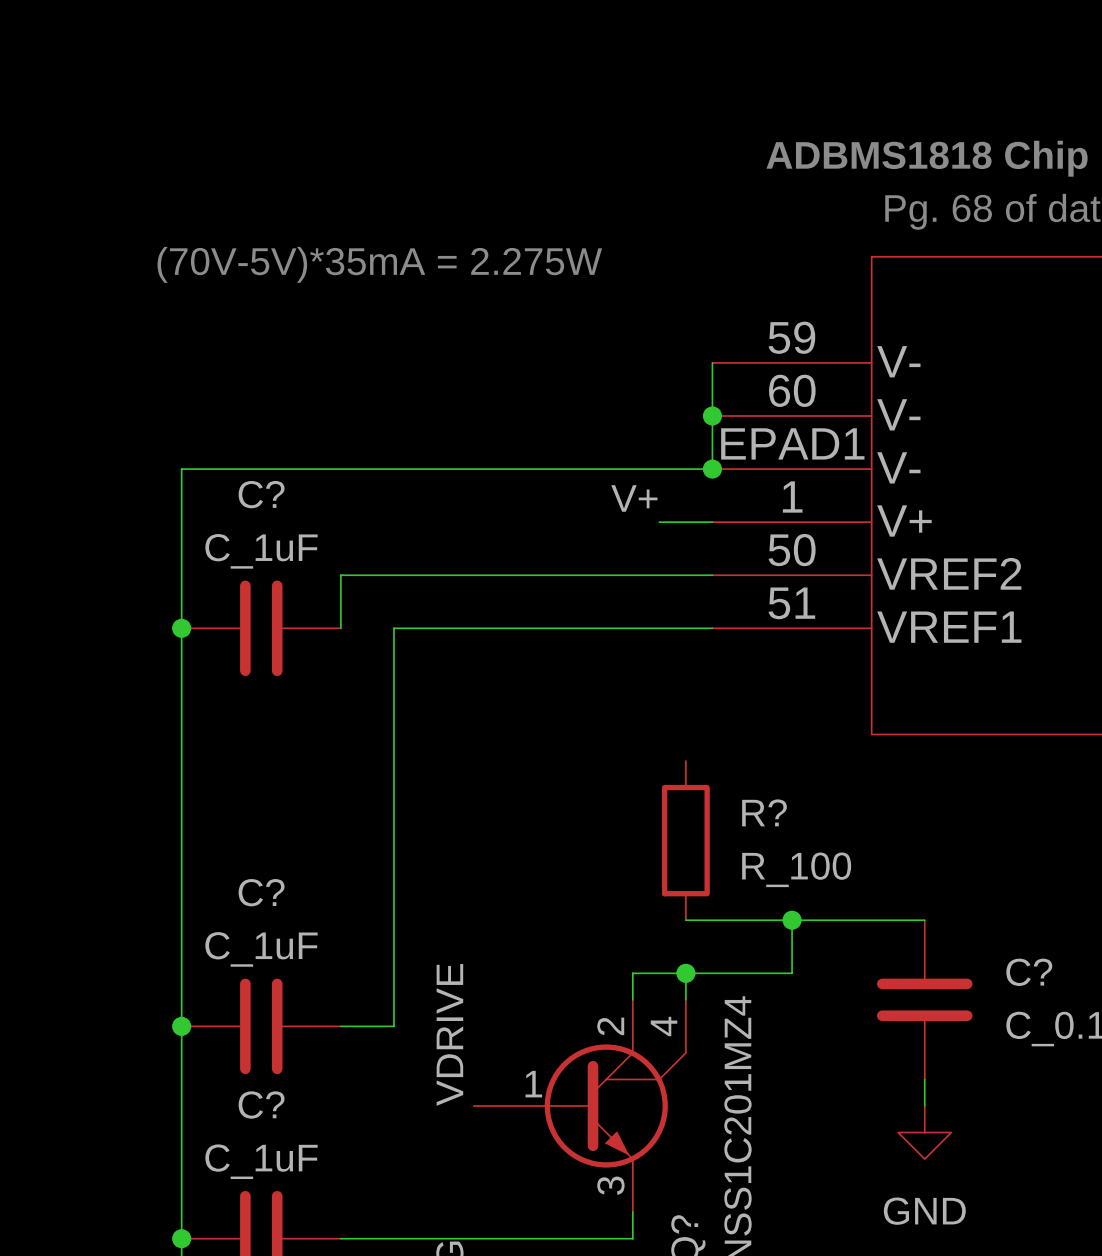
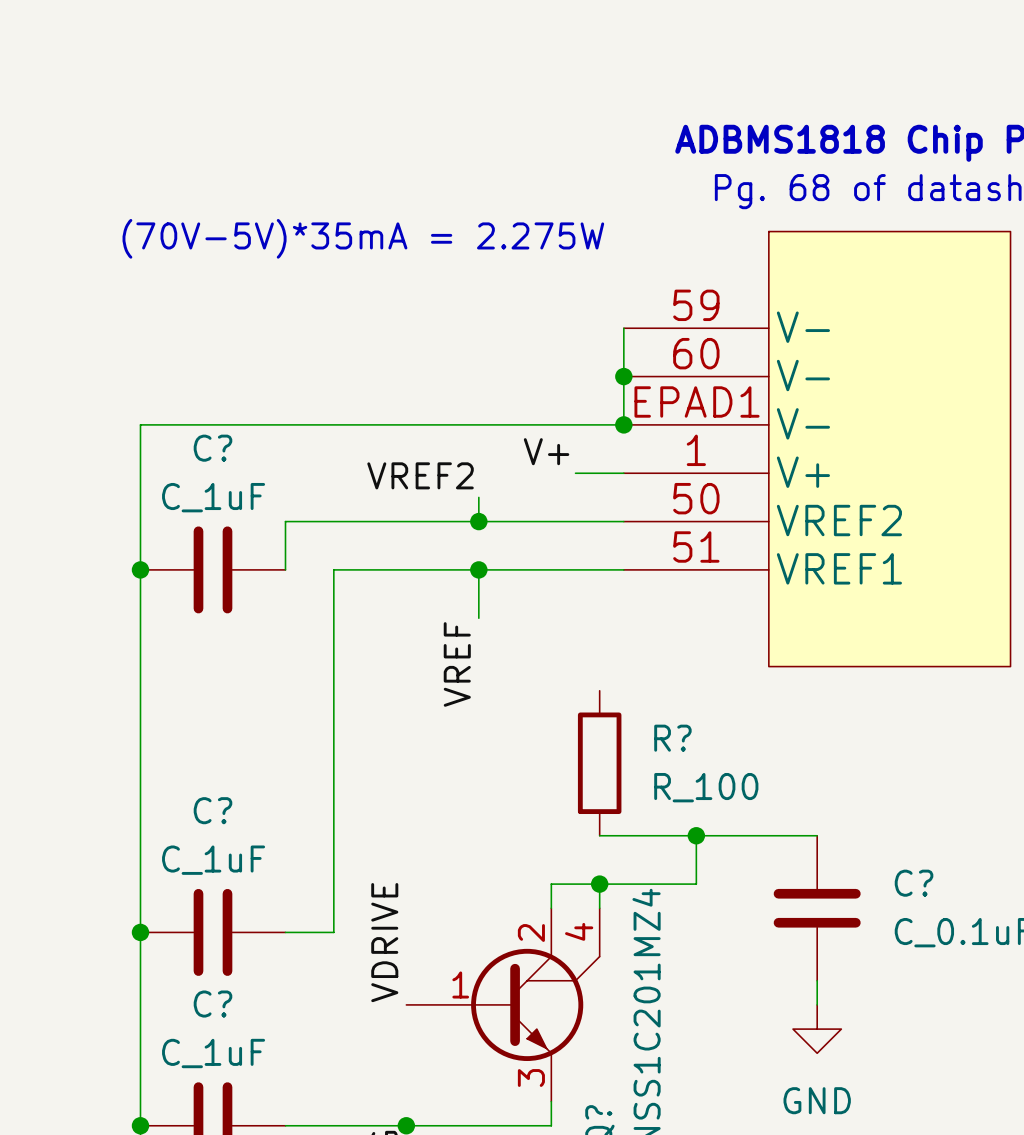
label: none -> VREF2 (420, 475)
wire: none -> (478, 497) (478, 521)
junction: none -> (478, 521)
wire: none -> (478, 569) (478, 618)
junction: none -> (478, 569)
label: none -> VREF (457, 664)
junction: none -> (406, 1125)

